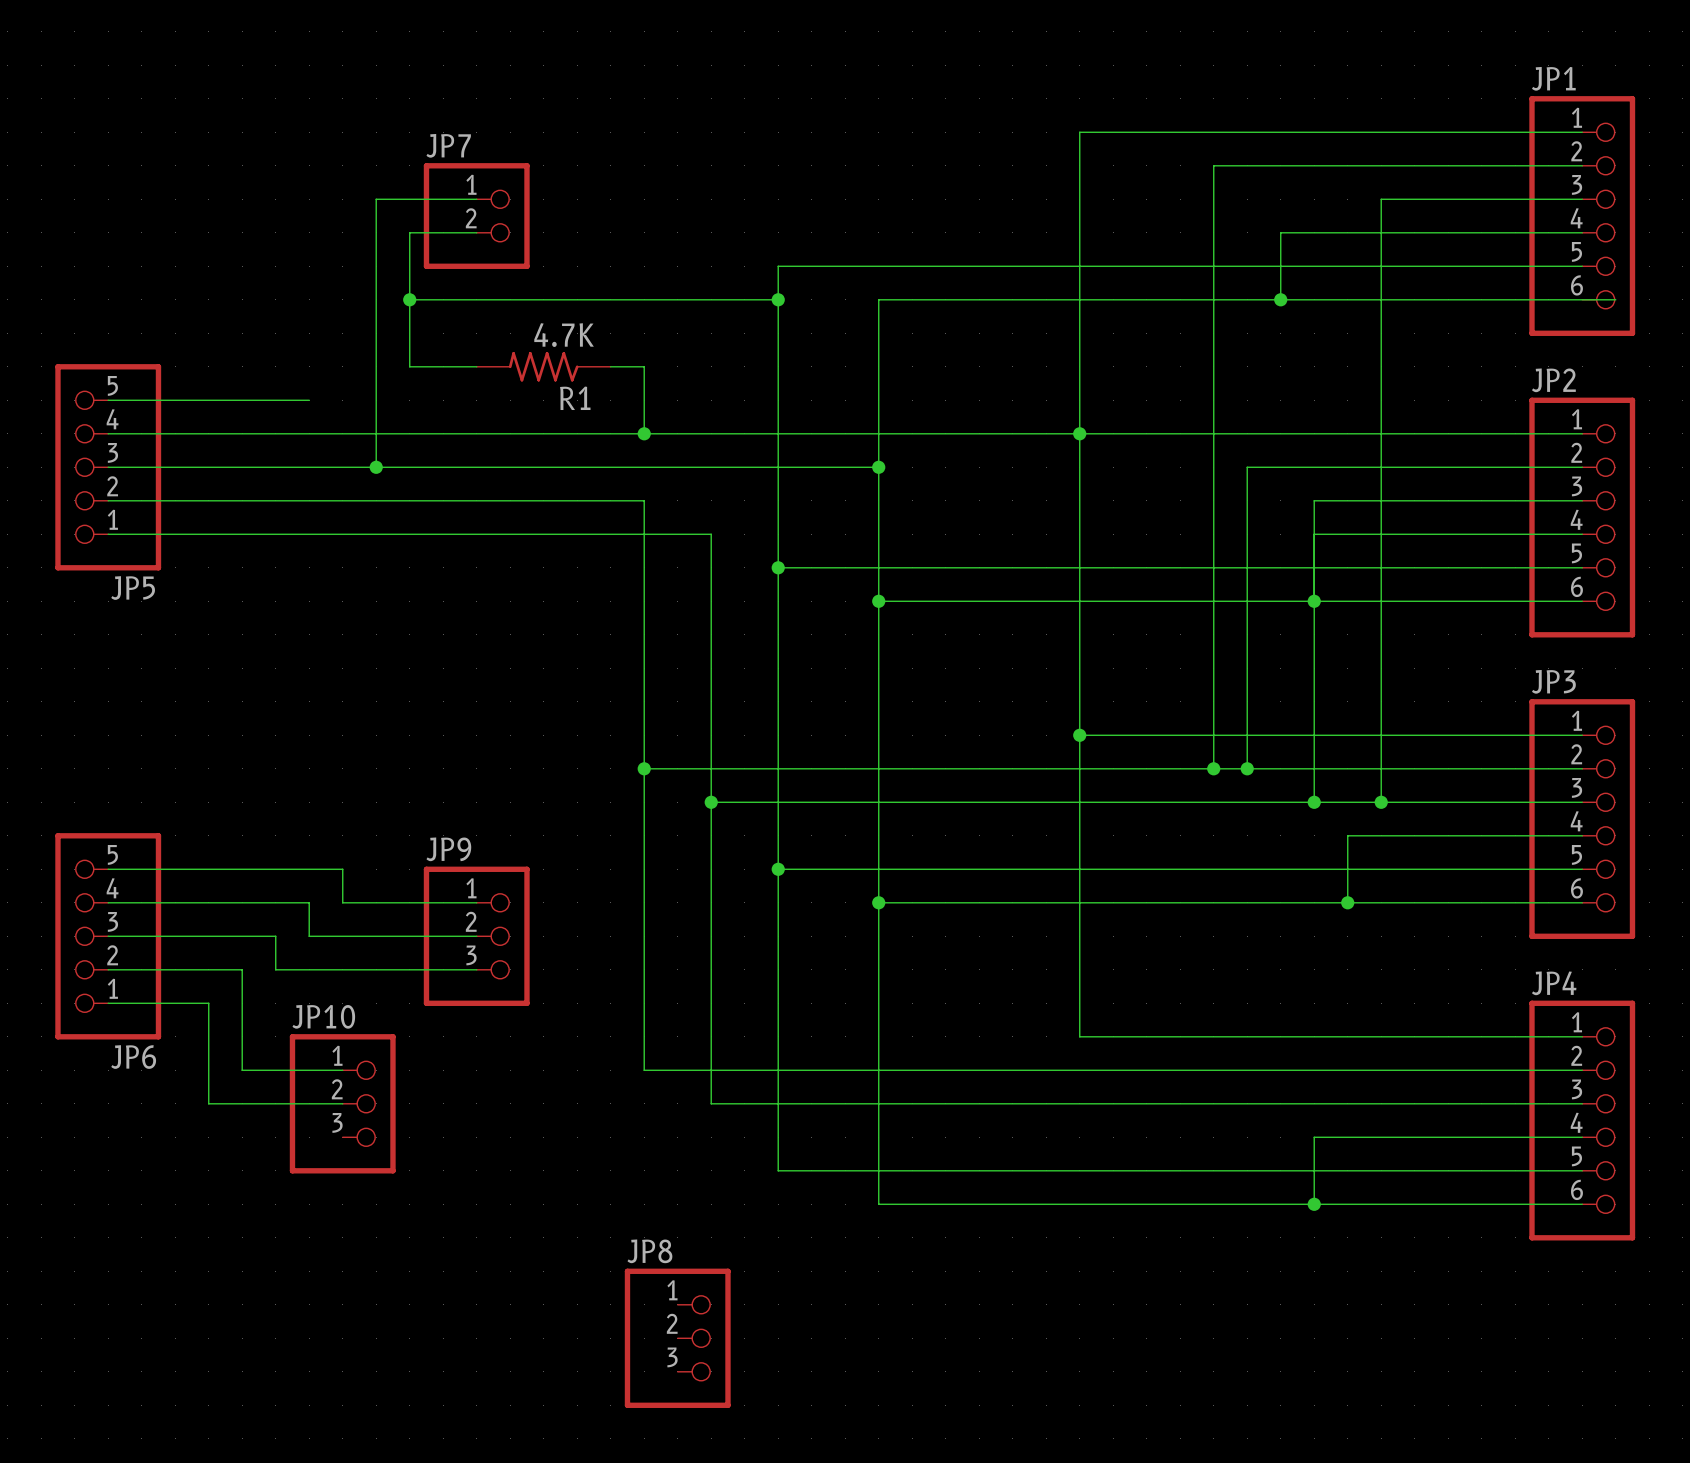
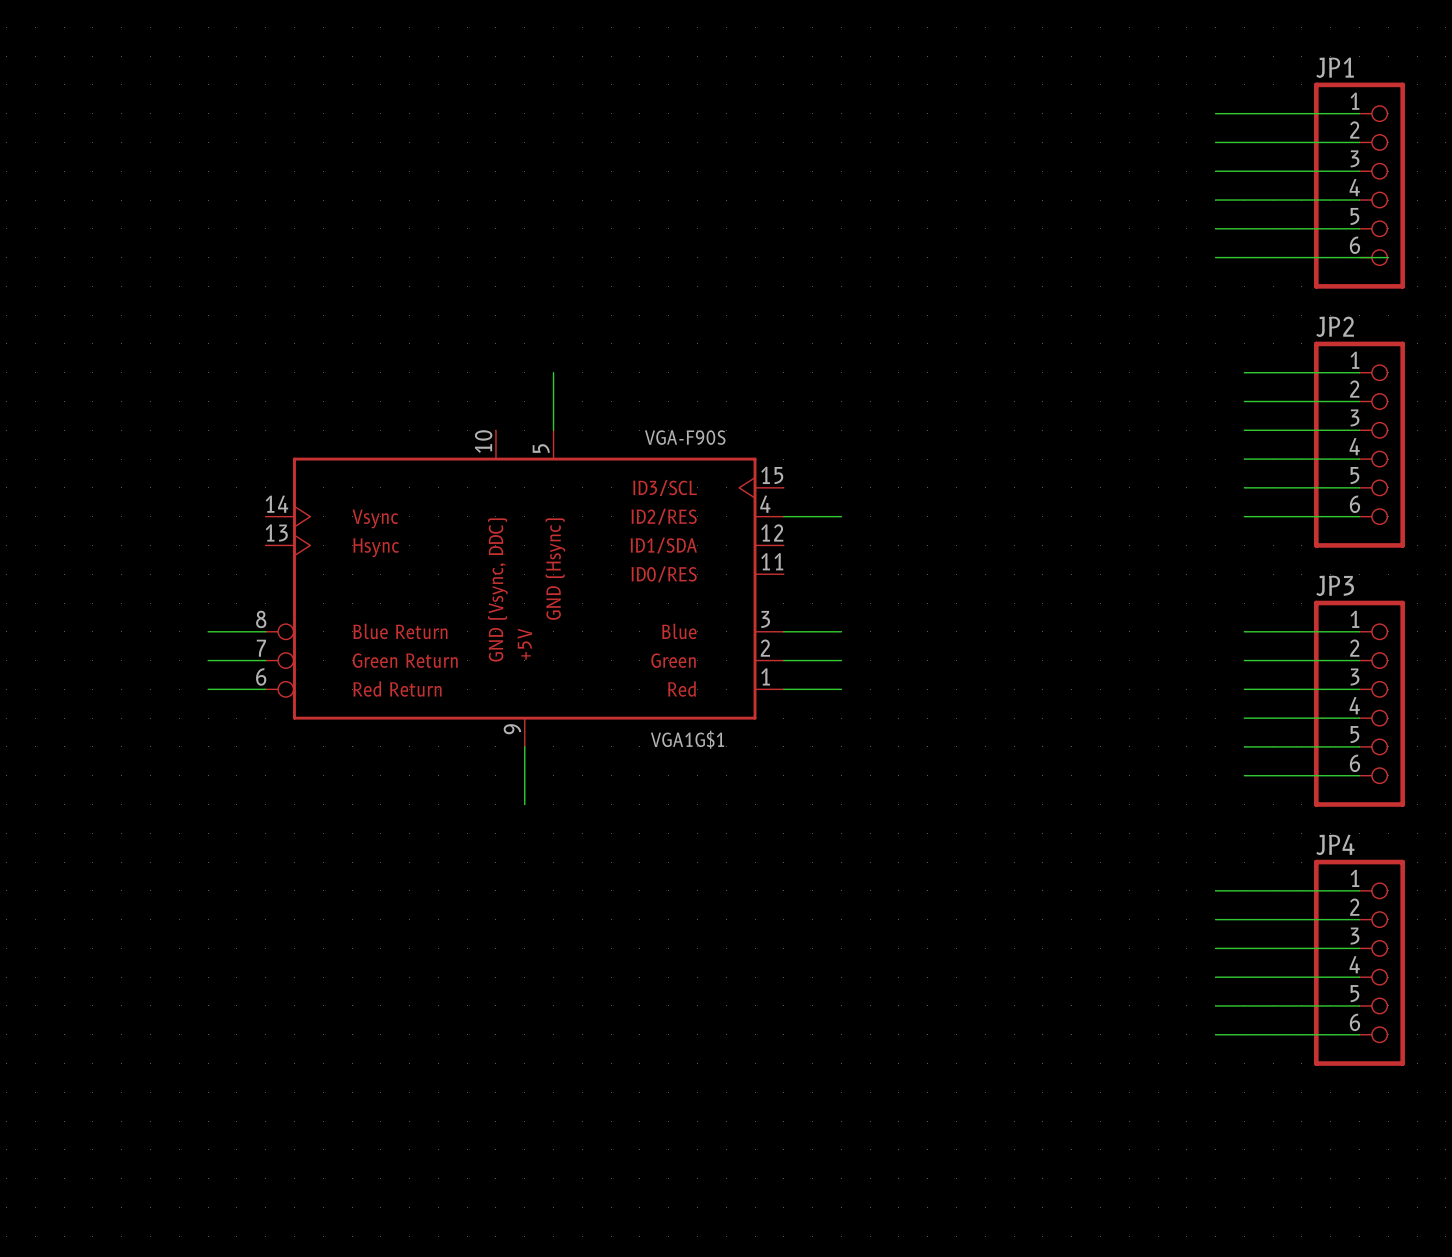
wire: (1414, 132) (1079, 132) (1079, 1036) (1414, 1036) -> none
wire: (1414, 165) (1213, 165) (1213, 768) -> none
wire: (476, 199) (376, 199) (376, 467) -> none
wire: (1414, 199) (1381, 199) (1381, 802) -> none
JP7: (476, 216) -> none
wire: (476, 232) (409, 232) (409, 366) (476, 366) -> none
wire: (1414, 232) (1280, 232) (1280, 299) -> none
wire: (1414, 266) (778, 266) (778, 1170) (1414, 1170) -> none
wire: (409, 299) (778, 299) -> none
junction: (409, 299) -> none
junction: (778, 299) -> none
junction: (1280, 299) -> none
wire: (1414, 299) (878, 299) (878, 1204) (1414, 1204) -> none
R1: 4.7K (543, 366) -> none
wire: (610, 366) (644, 366) (644, 433) -> (553, 430) (553, 372)
wire: (108, 400) (309, 400) -> none
wire: (108, 433) (1448, 433) -> none
junction: (644, 433) -> none
junction: (1079, 433) -> none
wire: (108, 467) (878, 467) -> none
JP5: (108, 467) -> none
junction: (376, 467) -> none
junction: (878, 467) -> none
wire: (1448, 467) (1247, 467) (1247, 768) -> none
wire: (108, 500) (644, 500) (644, 1070) (1414, 1070) -> none
wire: (1448, 500) (1314, 500) (1314, 802) -> none
wire: (108, 534) (711, 534) (711, 1103) (1414, 1103) -> none
wire: (1314, 534) (1448, 534) -> none
wire: (778, 567) (1448, 567) -> none
junction: (778, 567) -> none
junction: (878, 601) -> none
wire: (979, 601) (1448, 601) -> none
junction: (1314, 601) -> none
VGA1G$1: none -> VGA-F90S (524, 588)
wire: none -> (208, 631) (265, 631)
wire: none -> (783, 631) (841, 631)
wire: (1079, 735) (1448, 735) -> none
junction: (1079, 735) -> none
wire: none -> (208, 660) (265, 660)
wire: (644, 768) (912, 768) -> none
junction: (644, 768) -> none
wire: (979, 768) (1448, 768) -> none
junction: (1213, 768) -> none
junction: (1247, 768) -> none
wire: none -> (208, 689) (265, 689)
wire: (711, 802) (912, 802) -> none
junction: (711, 802) -> none
wire: (979, 802) (1448, 802) -> none
junction: (1314, 802) -> none
junction: (1381, 802) -> none
wire: (1448, 835) (1347, 835) (1347, 902) -> none
wire: (108, 869) (342, 869) (342, 902) (476, 902) -> none
wire: none -> (524, 746) (524, 804)
wire: (778, 869) (1448, 869) -> none
junction: (778, 869) -> none
wire: (108, 902) (309, 902) (309, 936) (476, 936) -> none
wire: (878, 902) (1448, 902) -> none
junction: (878, 902) -> none
junction: (1347, 902) -> none
wire: (108, 936) (275, 936) (275, 969) (476, 969) -> none
JP6: (108, 936) -> none
JP9: (476, 936) -> none
wire: (108, 969) (242, 969) (242, 1070) (342, 1070) -> none
wire: (108, 1003) (208, 1003) (208, 1103) (342, 1103) -> none
JP10: (342, 1103) -> none
wire: (1414, 1137) (1314, 1137) (1314, 1204) -> none
junction: (1314, 1204) -> none
JP8: (677, 1338) -> none

